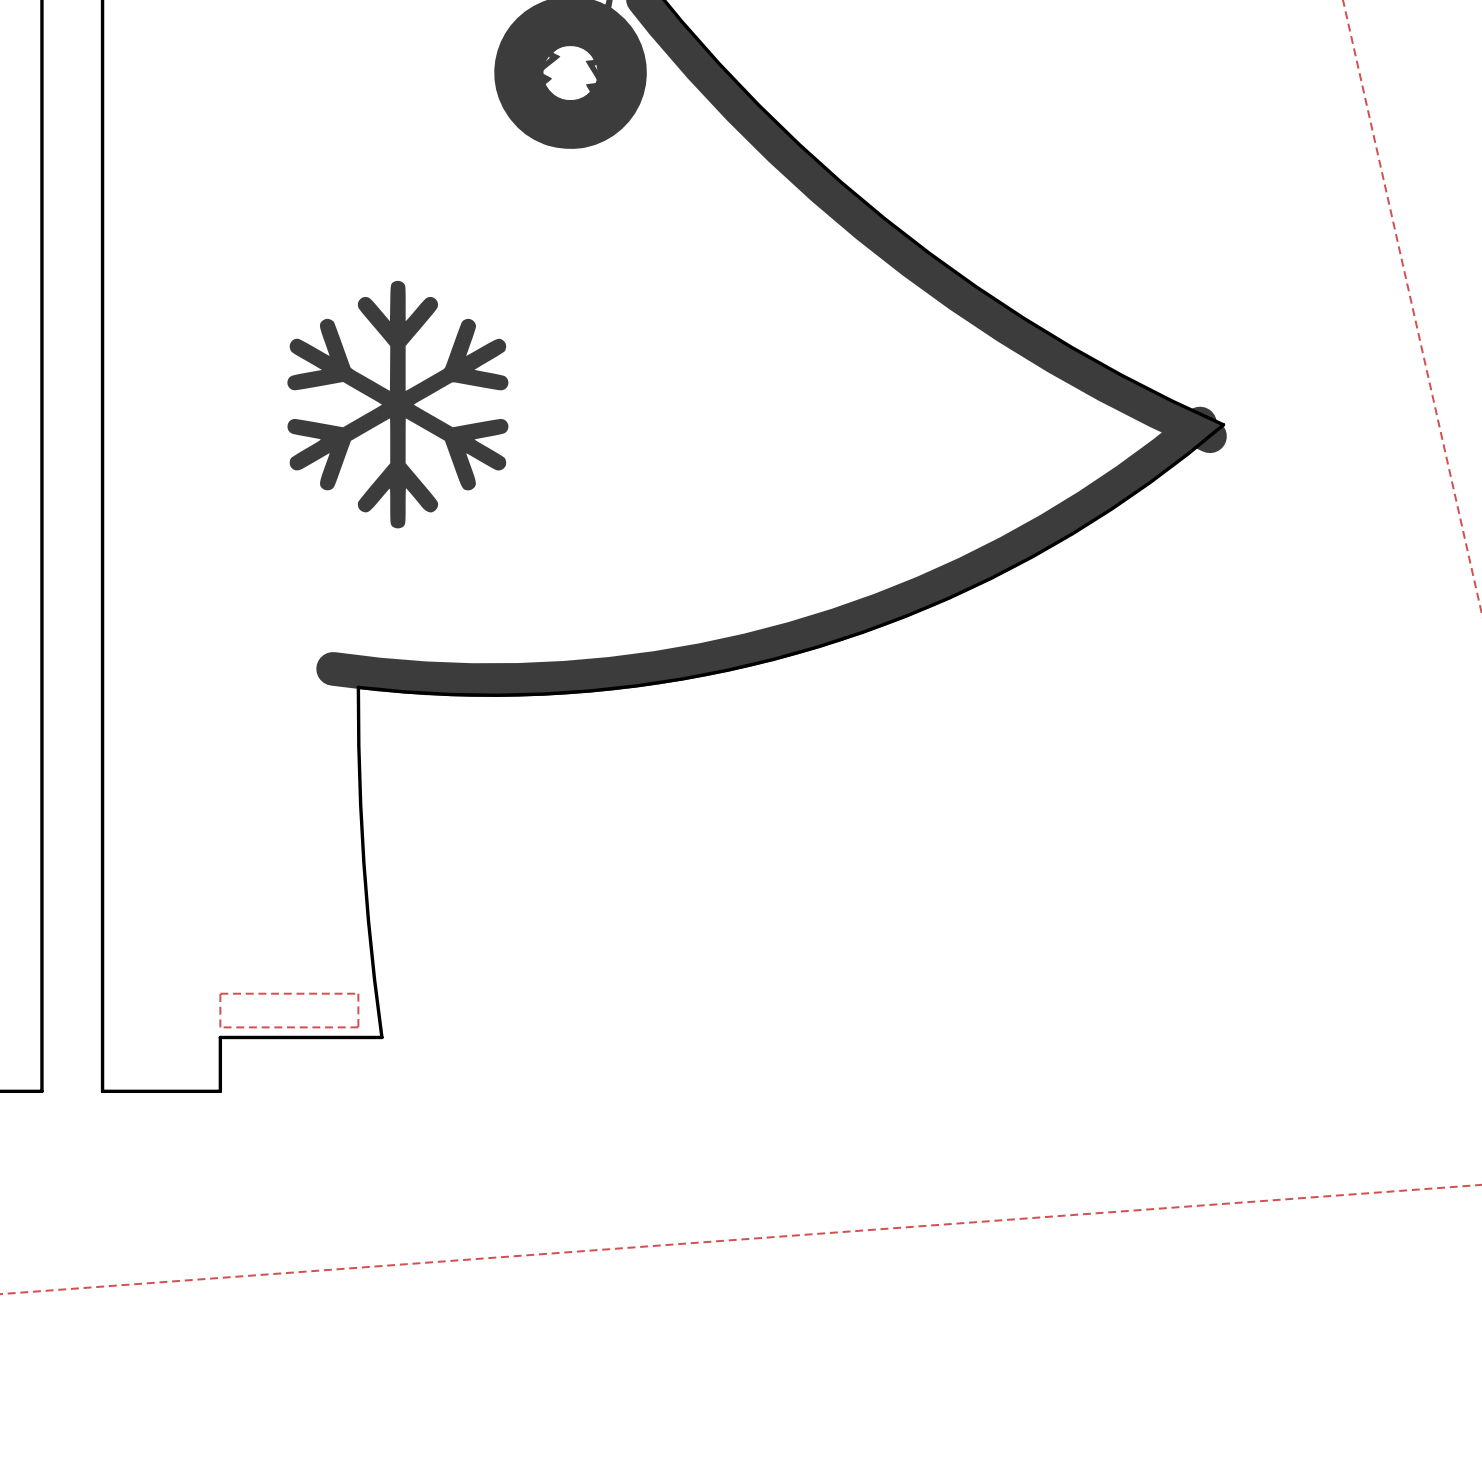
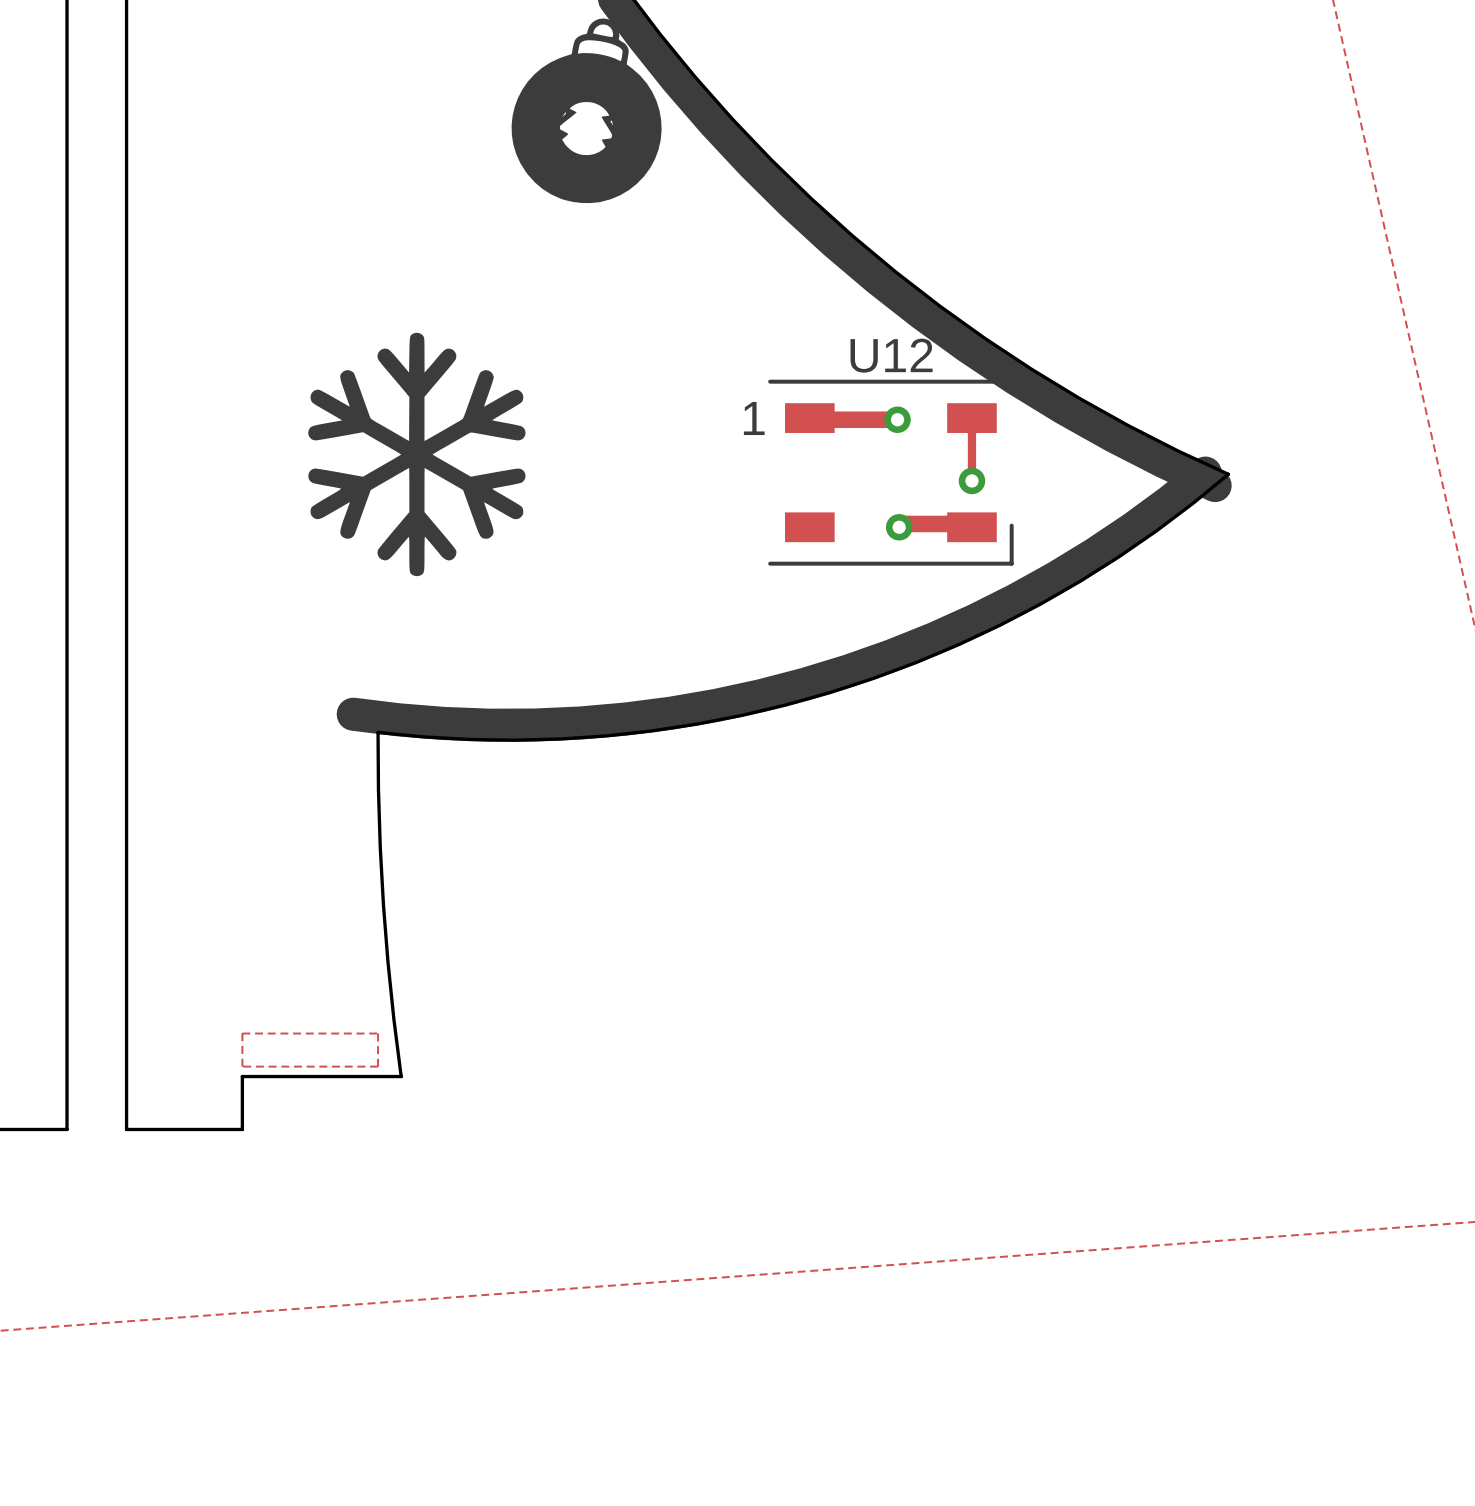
track: none -> (971, 418) (971, 480)
track: none -> (813, 419) (897, 419)
via: none -> (897, 419)
U12: none -> (890, 472)
via: none -> (971, 480)
track: none -> (902, 523) (973, 523)
via: none -> (899, 527)

